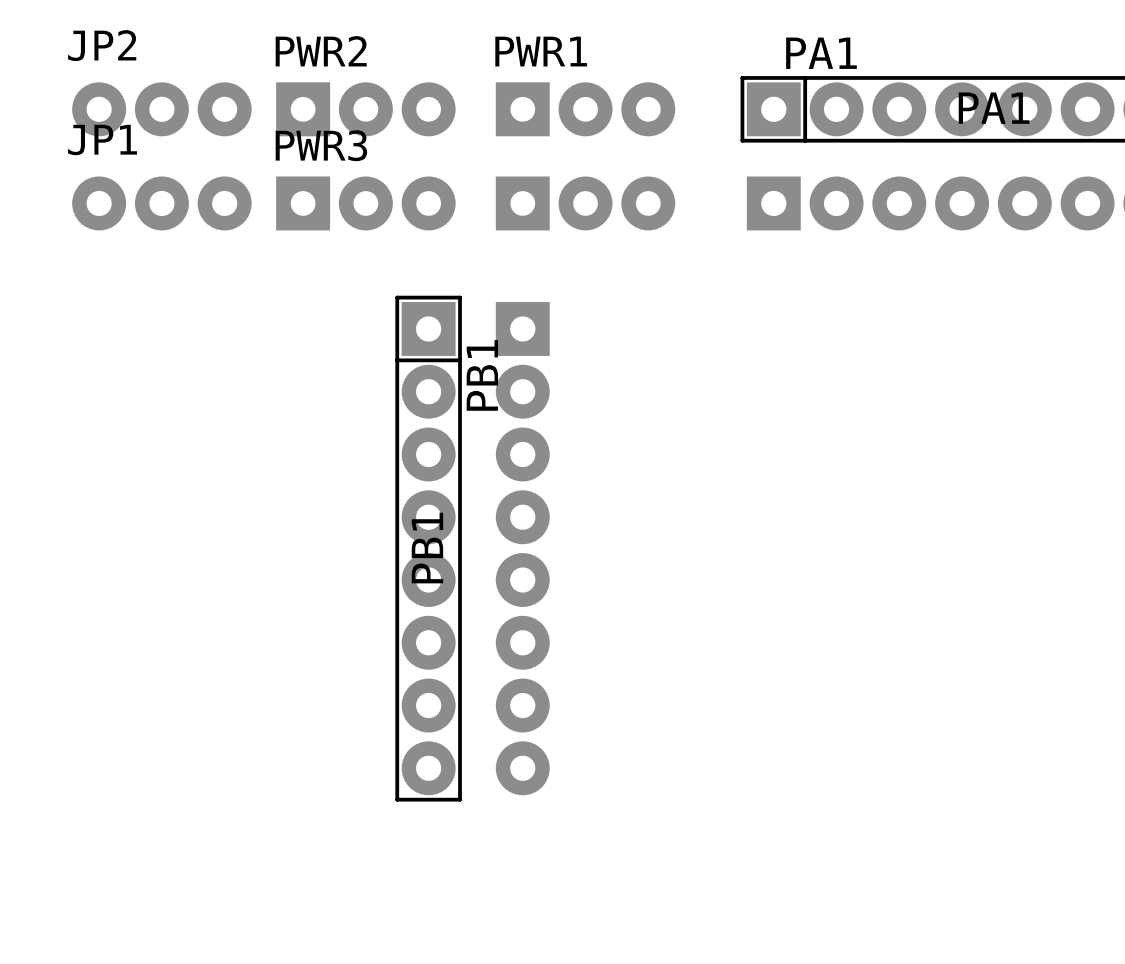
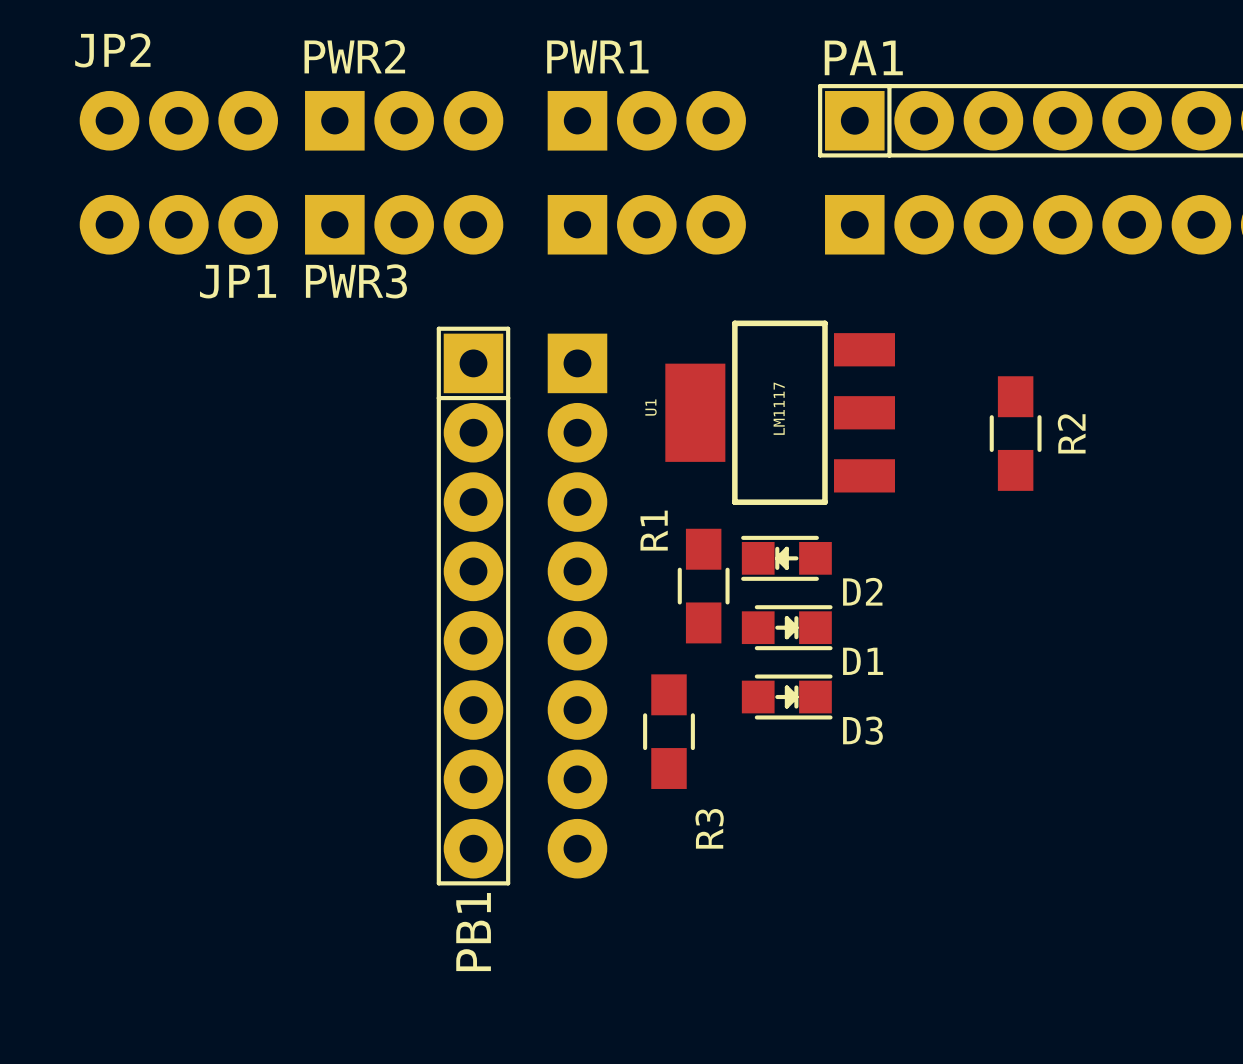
PA1 name position: PA1 (821, 53) -> PA1 (863, 57)
PA1 value: PA1 (994, 108) -> none
JP1 name position: JP1 (102, 140) -> JP1 (238, 281)
PWR3 name position: PWR3 (321, 145) -> PWR3 (356, 281)
U1: none -> LM1117 (780, 412)
PB1 name position: PB1 (482, 375) -> PB1 (473, 932)
R2: none -> (1015, 433)
D2: none -> (786, 558)
R1: none -> (703, 586)
PB1 value: PB1 (427, 548) -> none
D1: none -> (787, 627)
D3: none -> (787, 697)
R3: none -> (668, 731)

